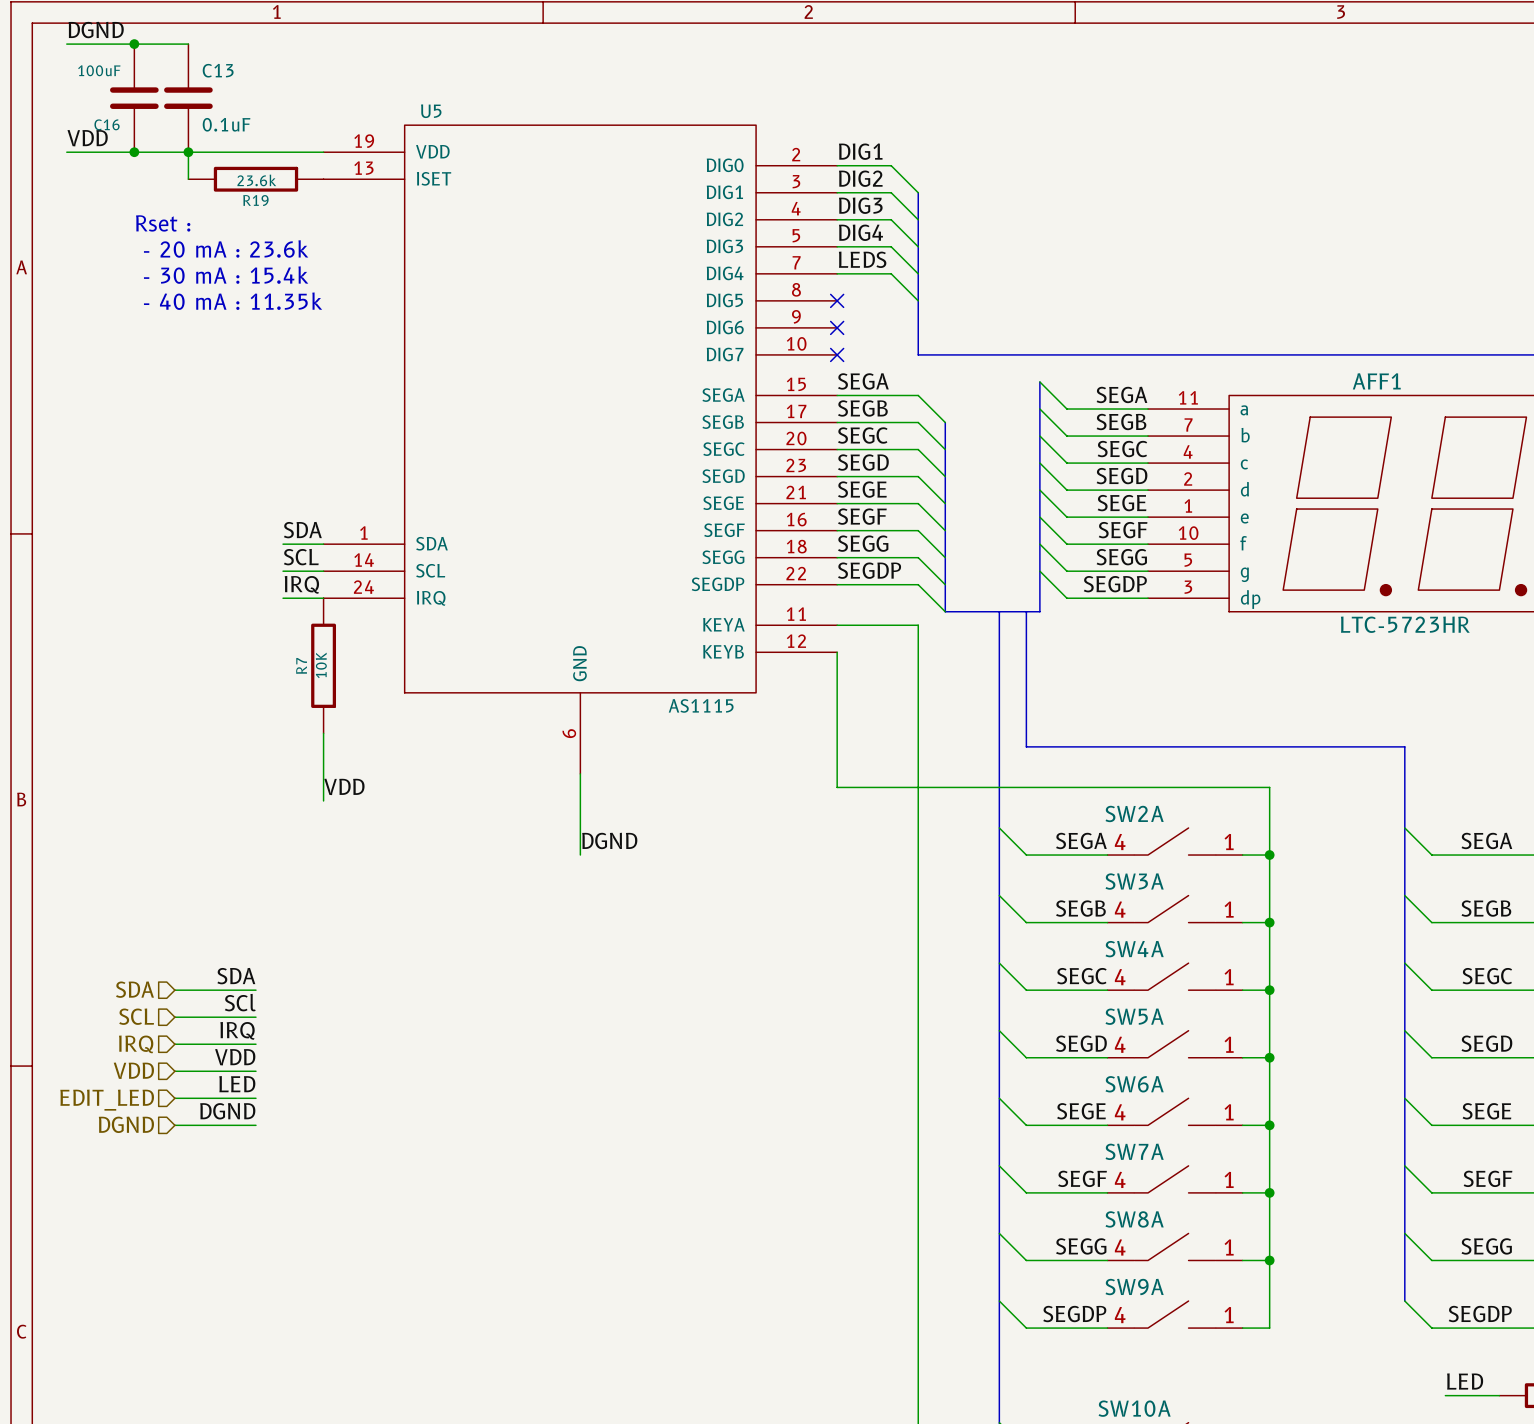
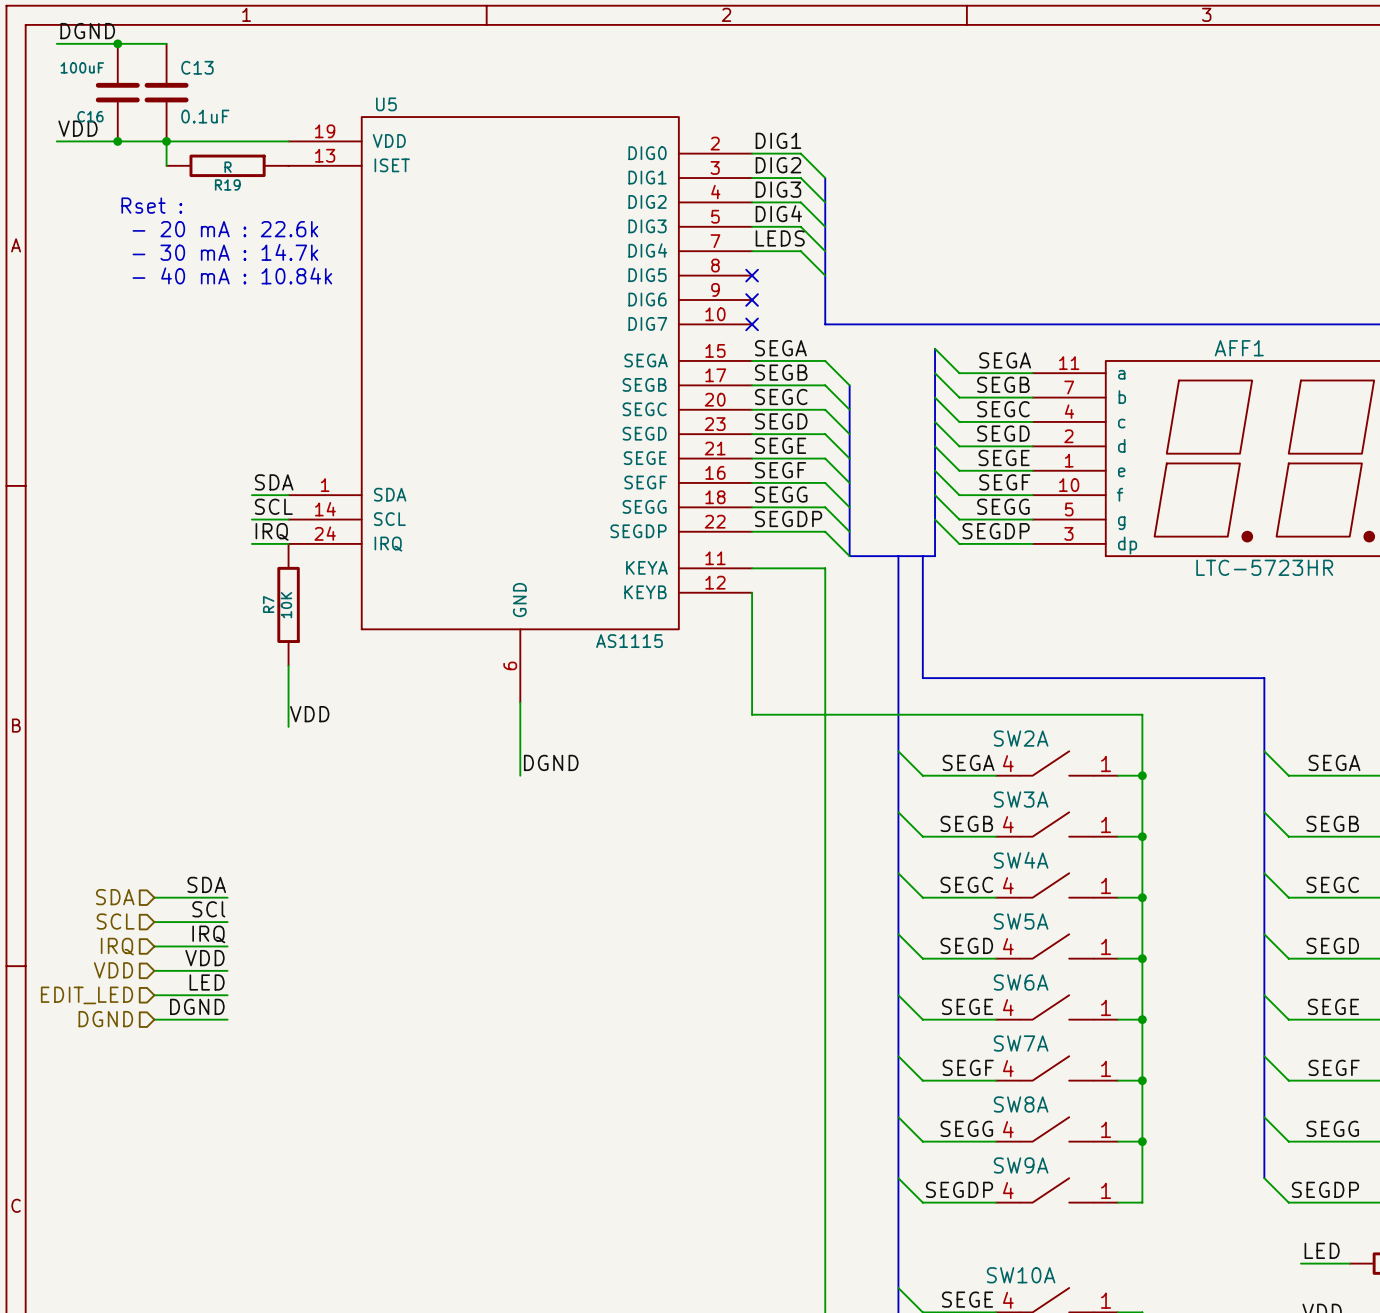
R19 value: 23.6k (256, 180) -> R (228, 167)
text: - 20 mA : 23.6k (226, 248) -> - 20 mA : 22.6k (225, 229)
text: - 30 mA : 15.4k (226, 275) -> - 30 mA : 14.7k (225, 252)
text: - 40 mA : 11.35k (233, 301) -> - 40 mA : 10.84k (232, 275)

